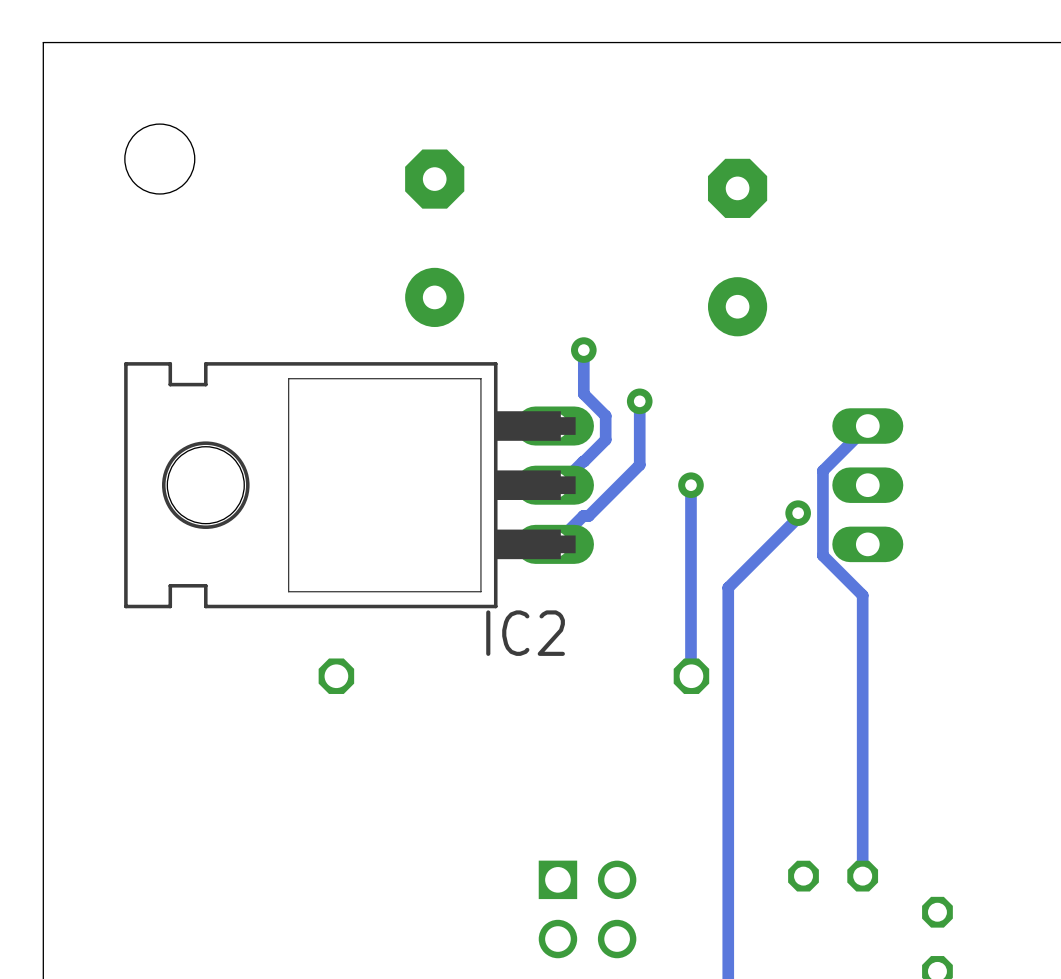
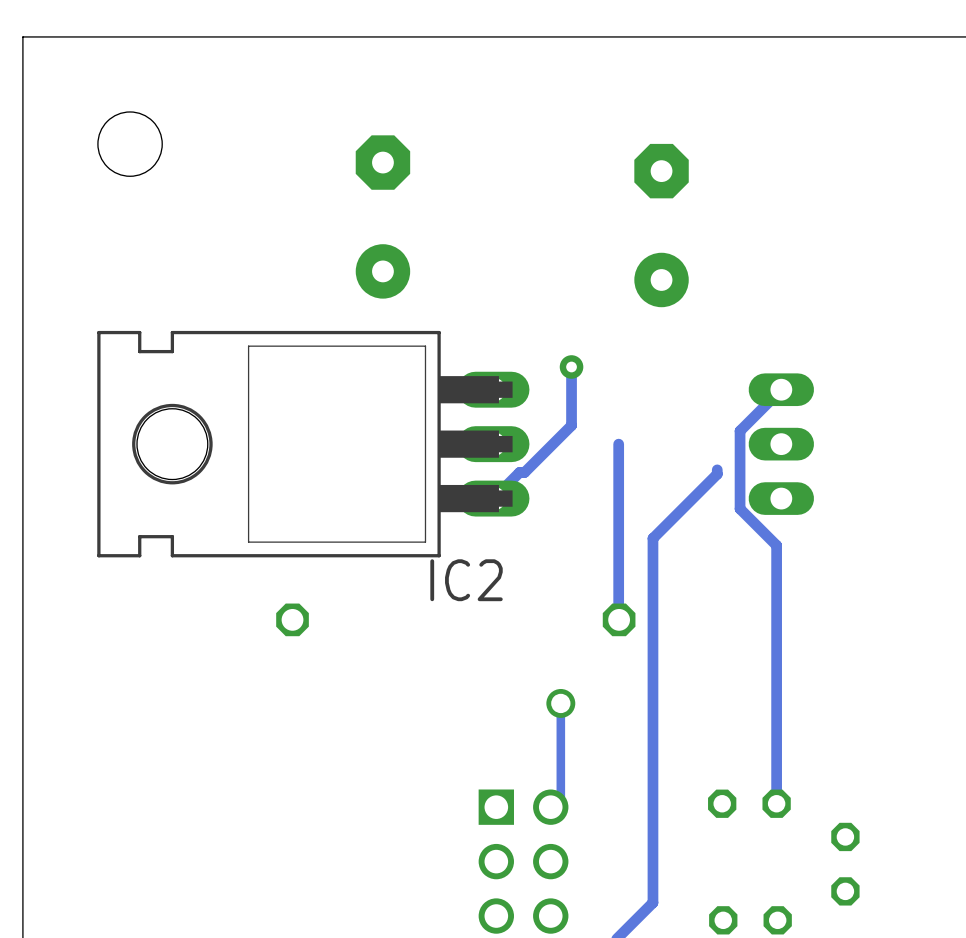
track: (583, 350) (583, 394) (605, 415) (605, 439) (559, 485) (554, 485) -> none
via: (583, 350) -> none
via: (690, 485) -> none
via: (798, 513) -> none
track: none -> (560, 703) (560, 797) (550, 807)
via: none -> (560, 703)

